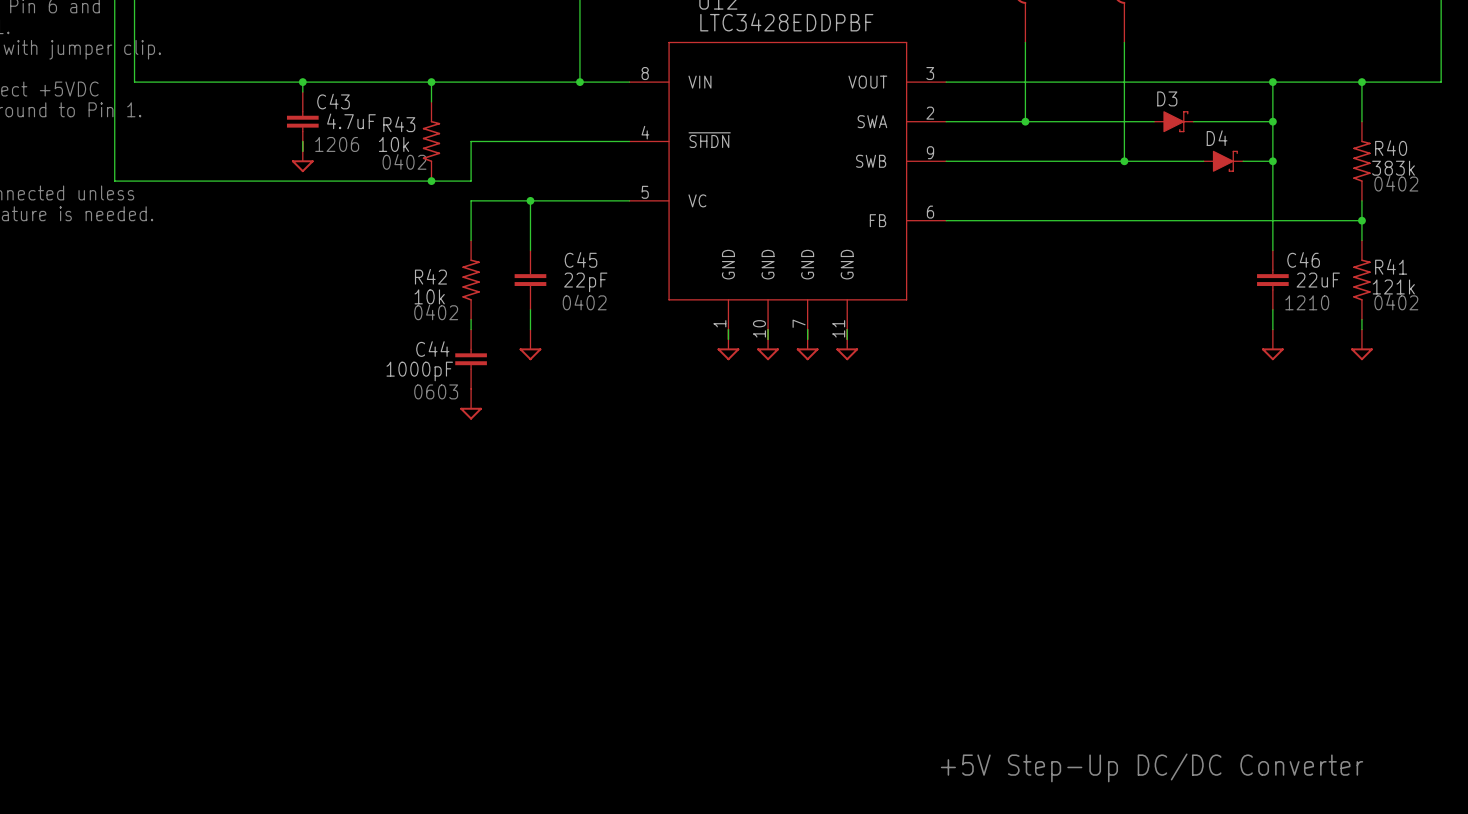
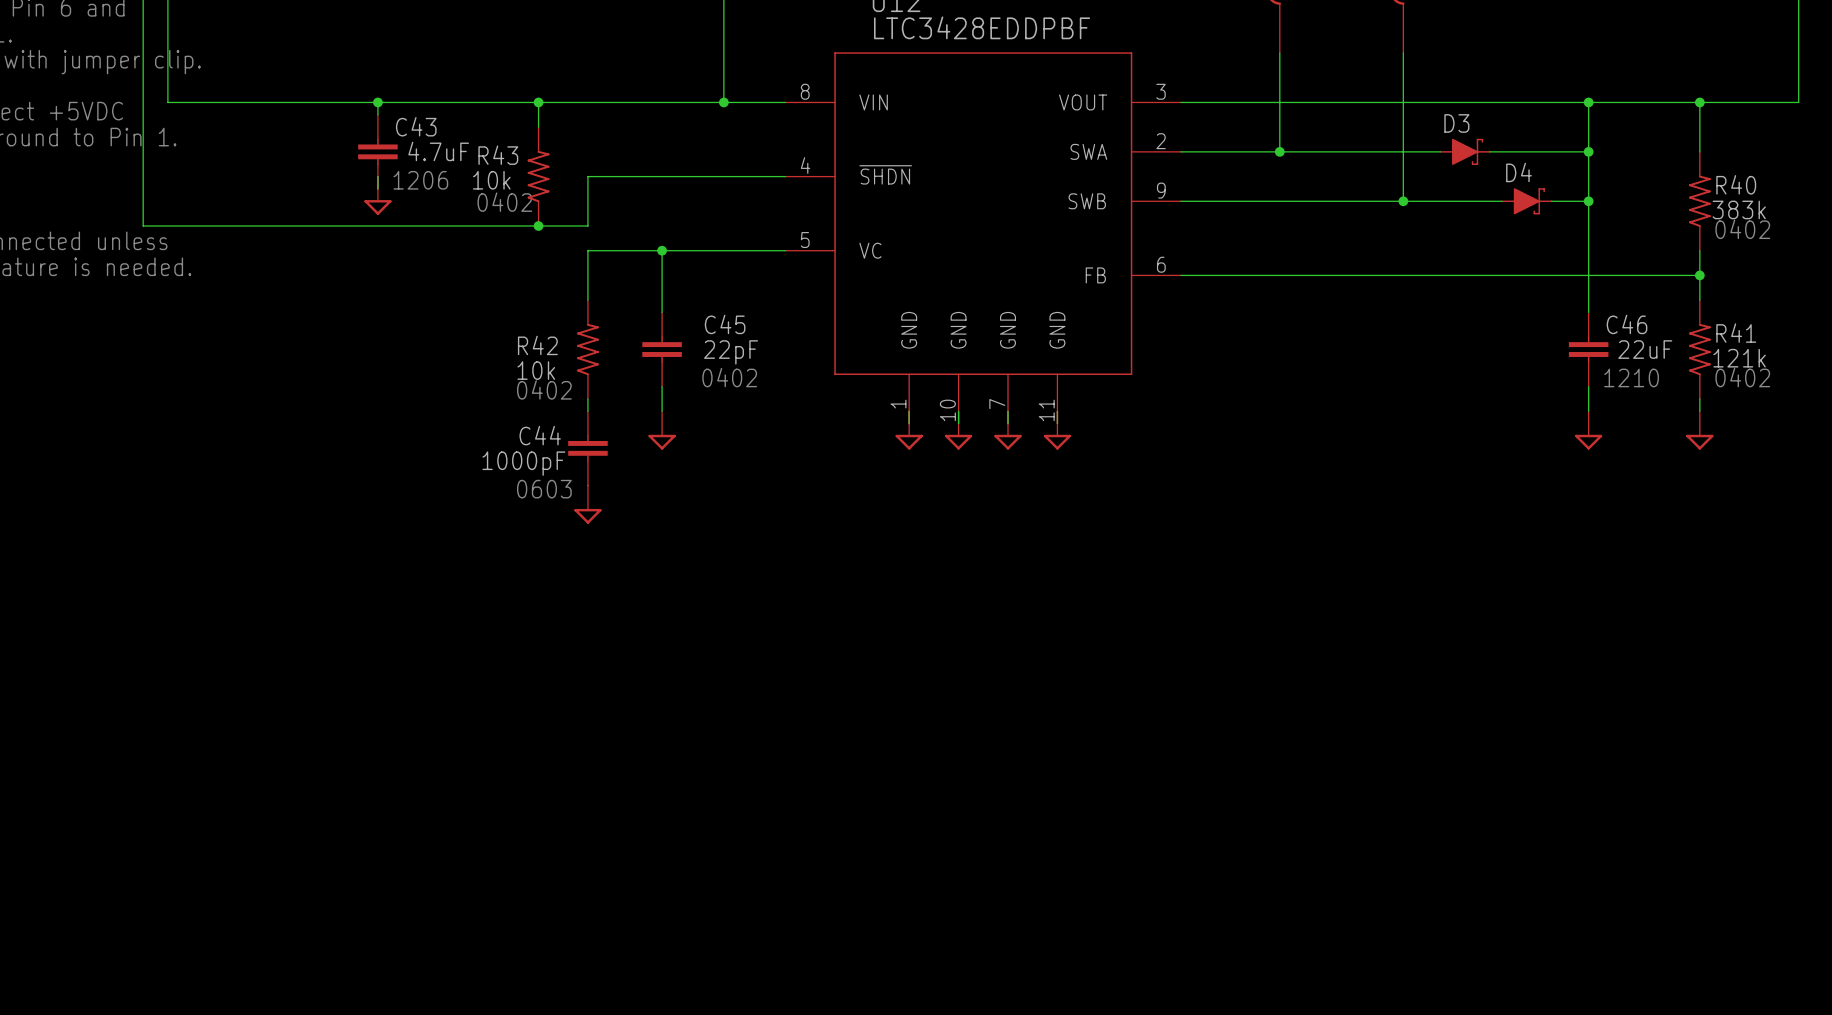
text: +5V Step-Up DC/DC Converter (1152, 767) -> none

